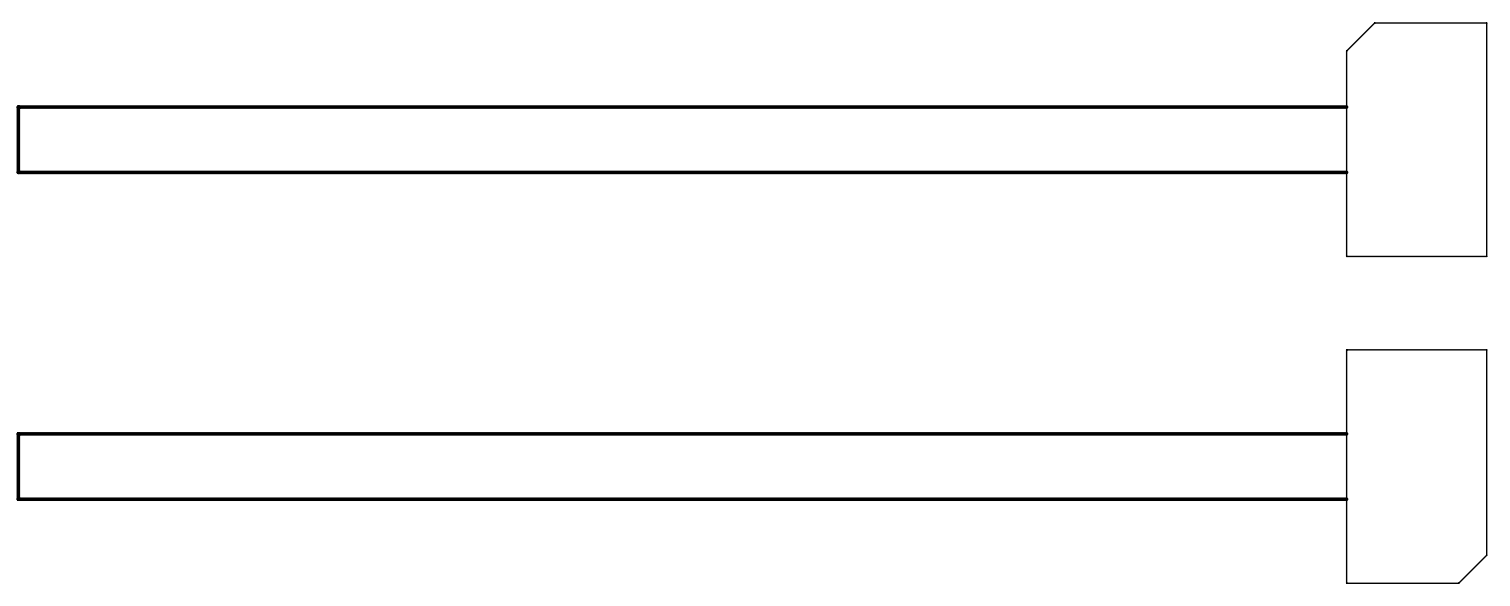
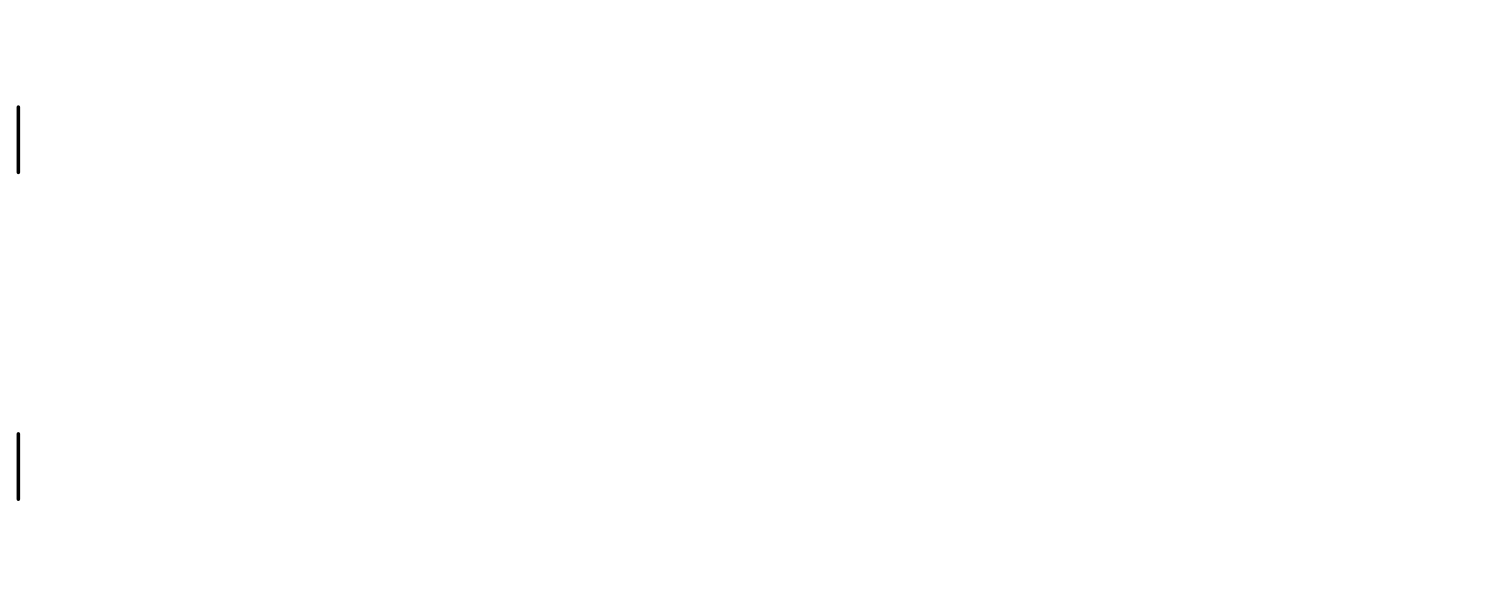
board edge: (1346, 107) (18, 107) -> none
part: (1416, 139) -> none
board edge: (1346, 172) (18, 172) -> none
board edge: (1346, 433) (18, 433) -> none
part: (1416, 466) -> none
board edge: (1346, 499) (18, 499) -> none

